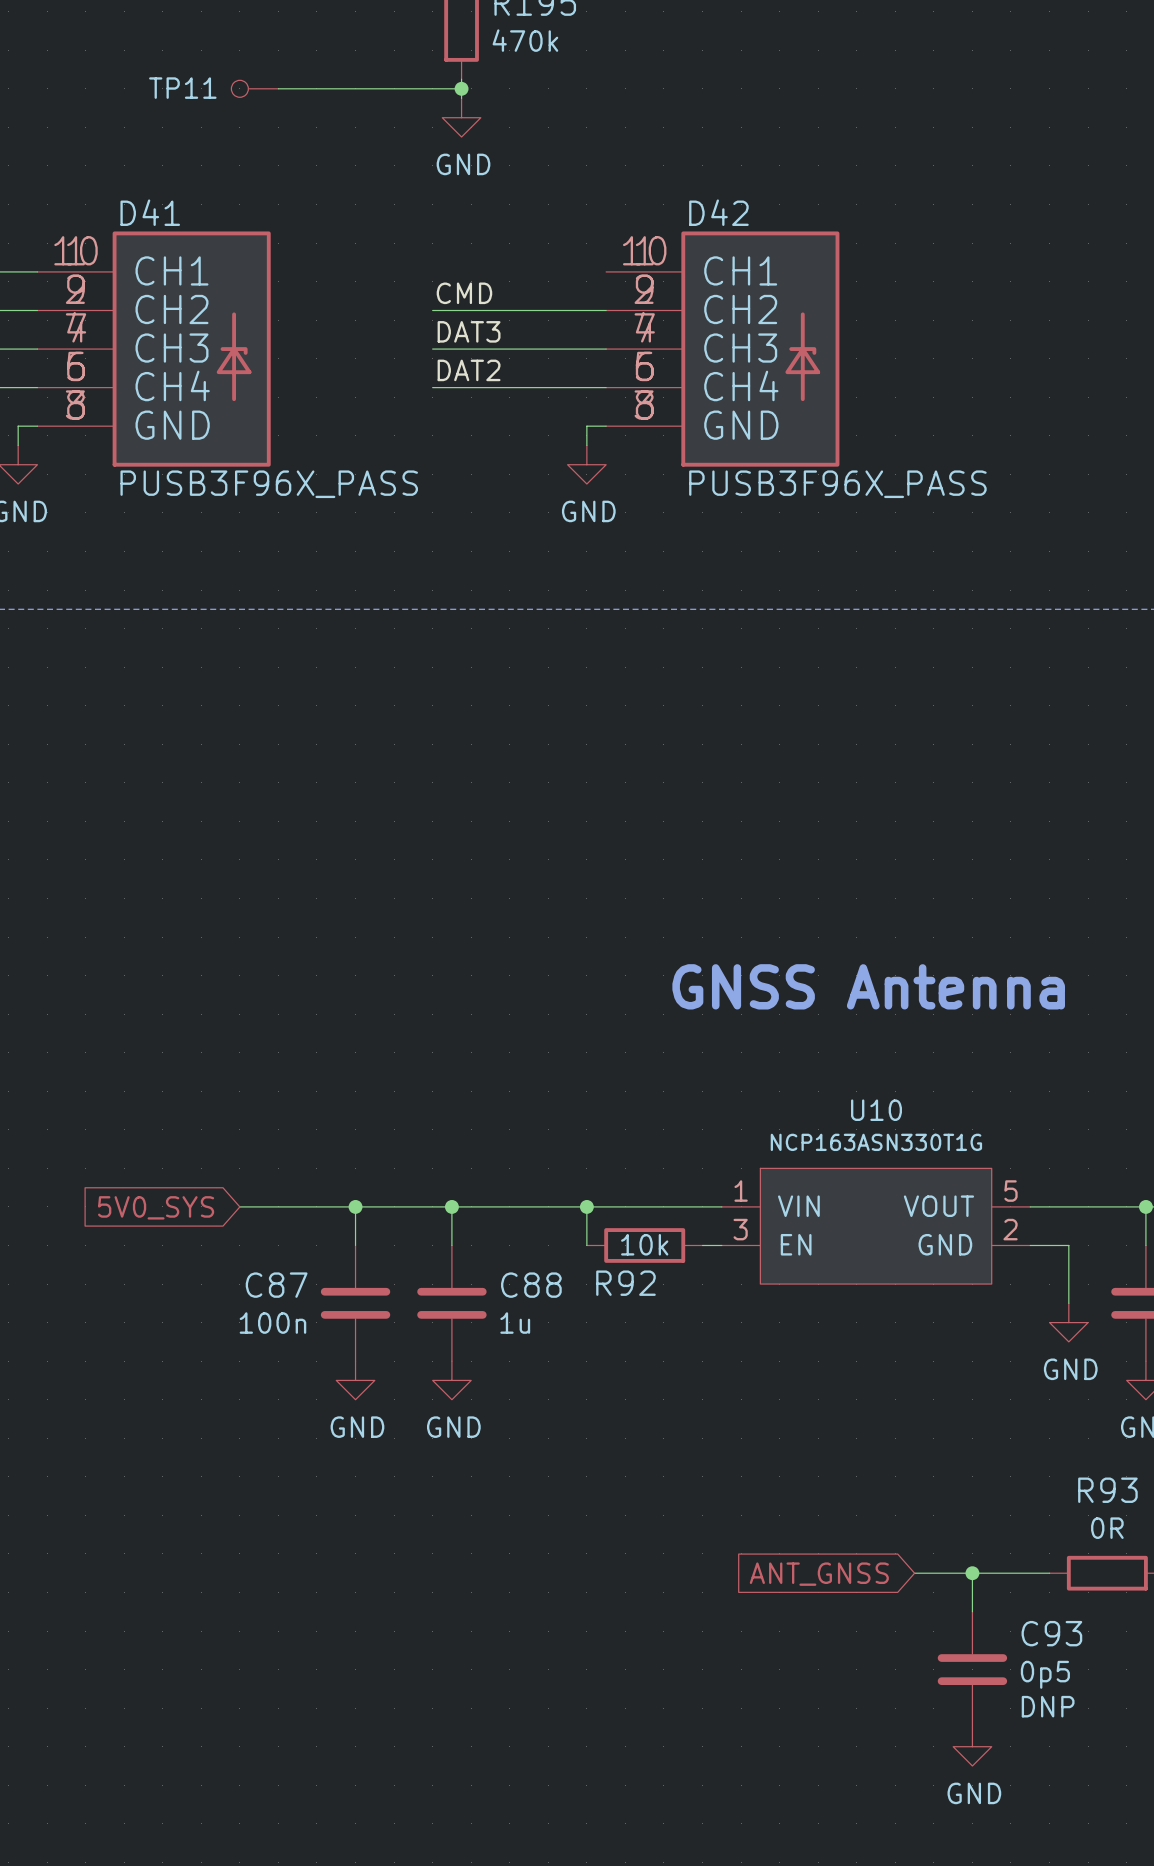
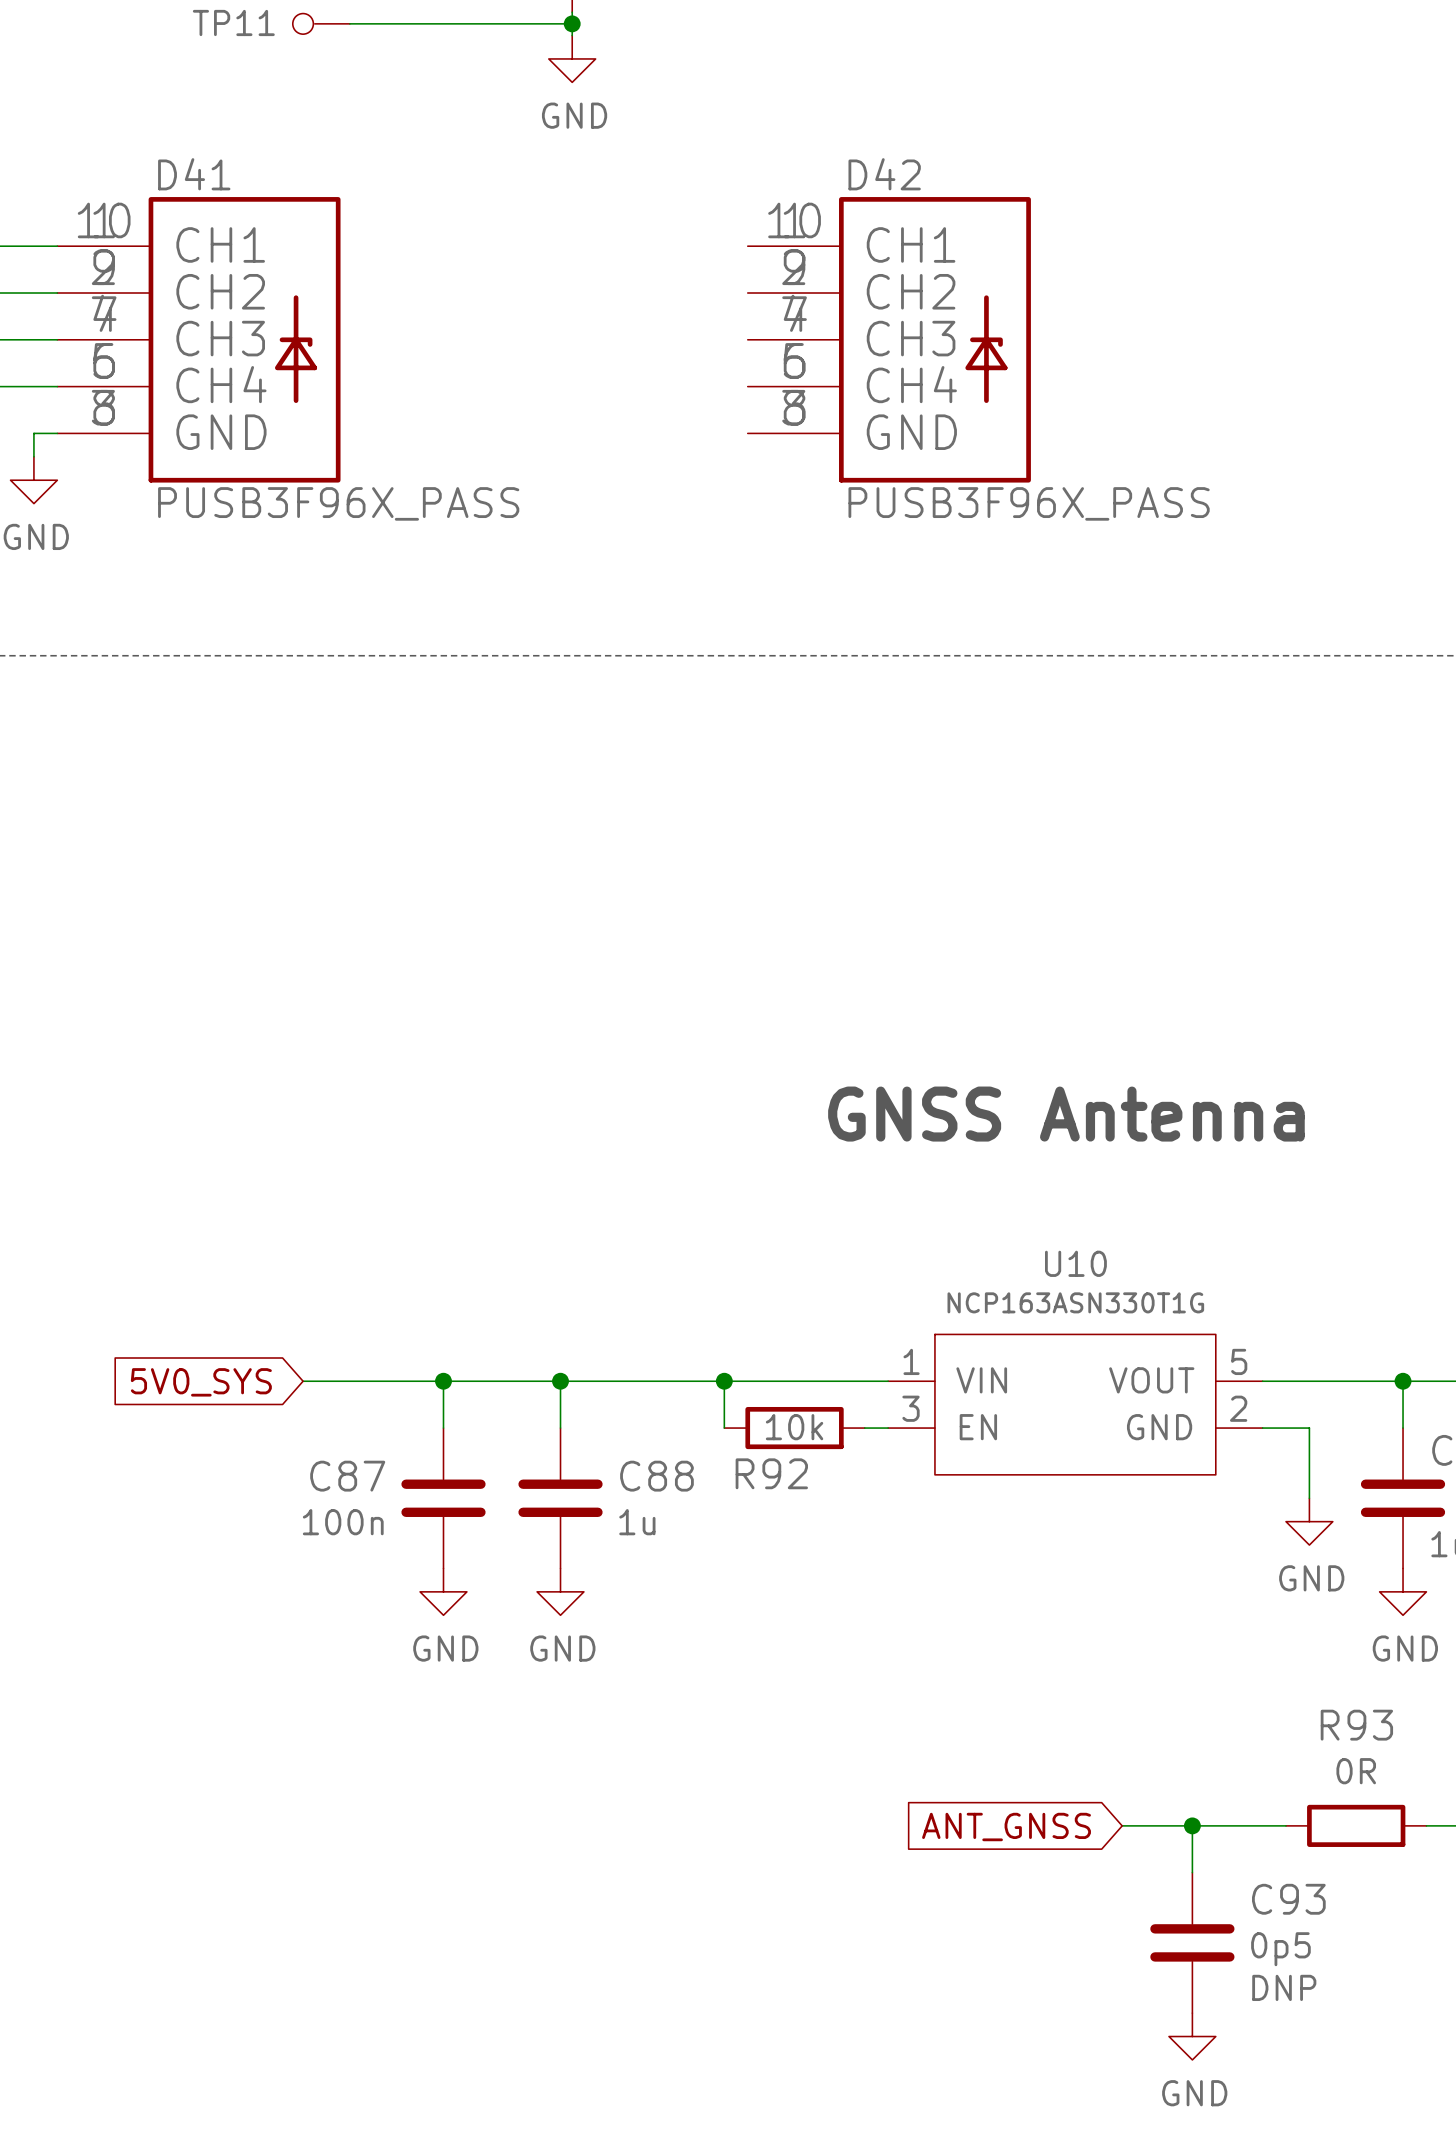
label: CMD (464, 293) -> none
wire: (432, 310) (606, 310) -> none
label: DAT3 (469, 331) -> none
wire: (432, 349) (606, 349) -> none
label: DAT2 (469, 370) -> none
wire: (432, 387) (606, 387) -> none
wire: (606, 426) (586, 426) (586, 445) -> none
power symbol: GND (586, 464) -> none

